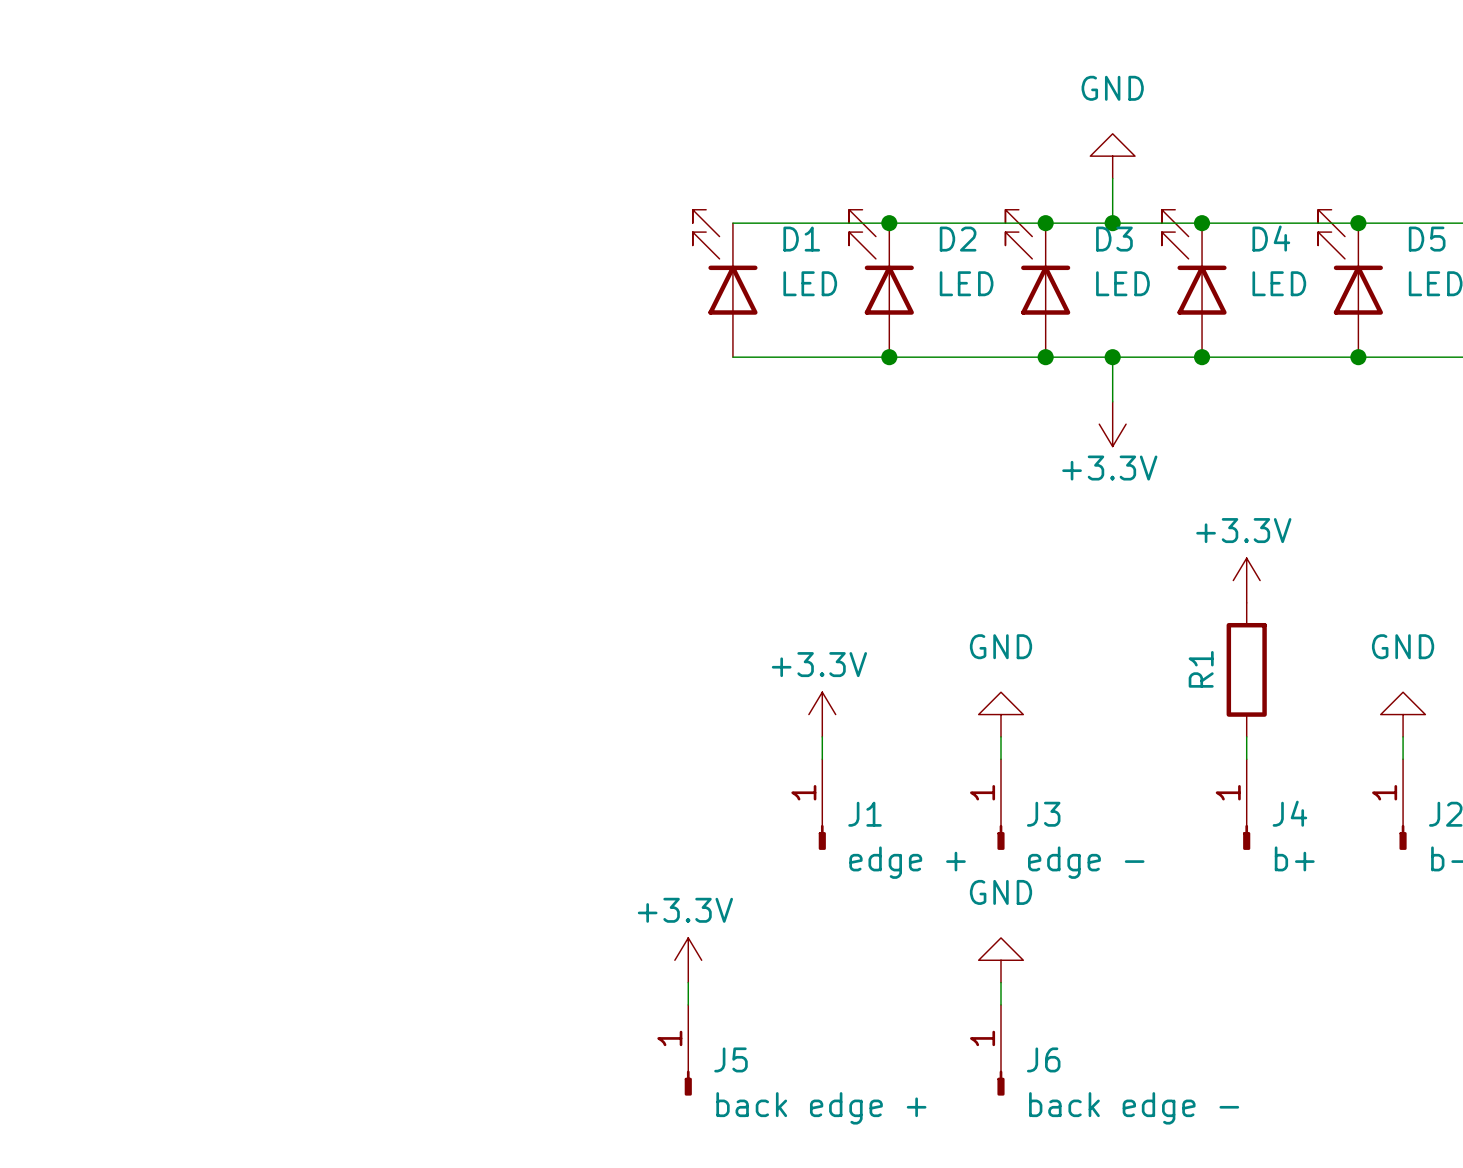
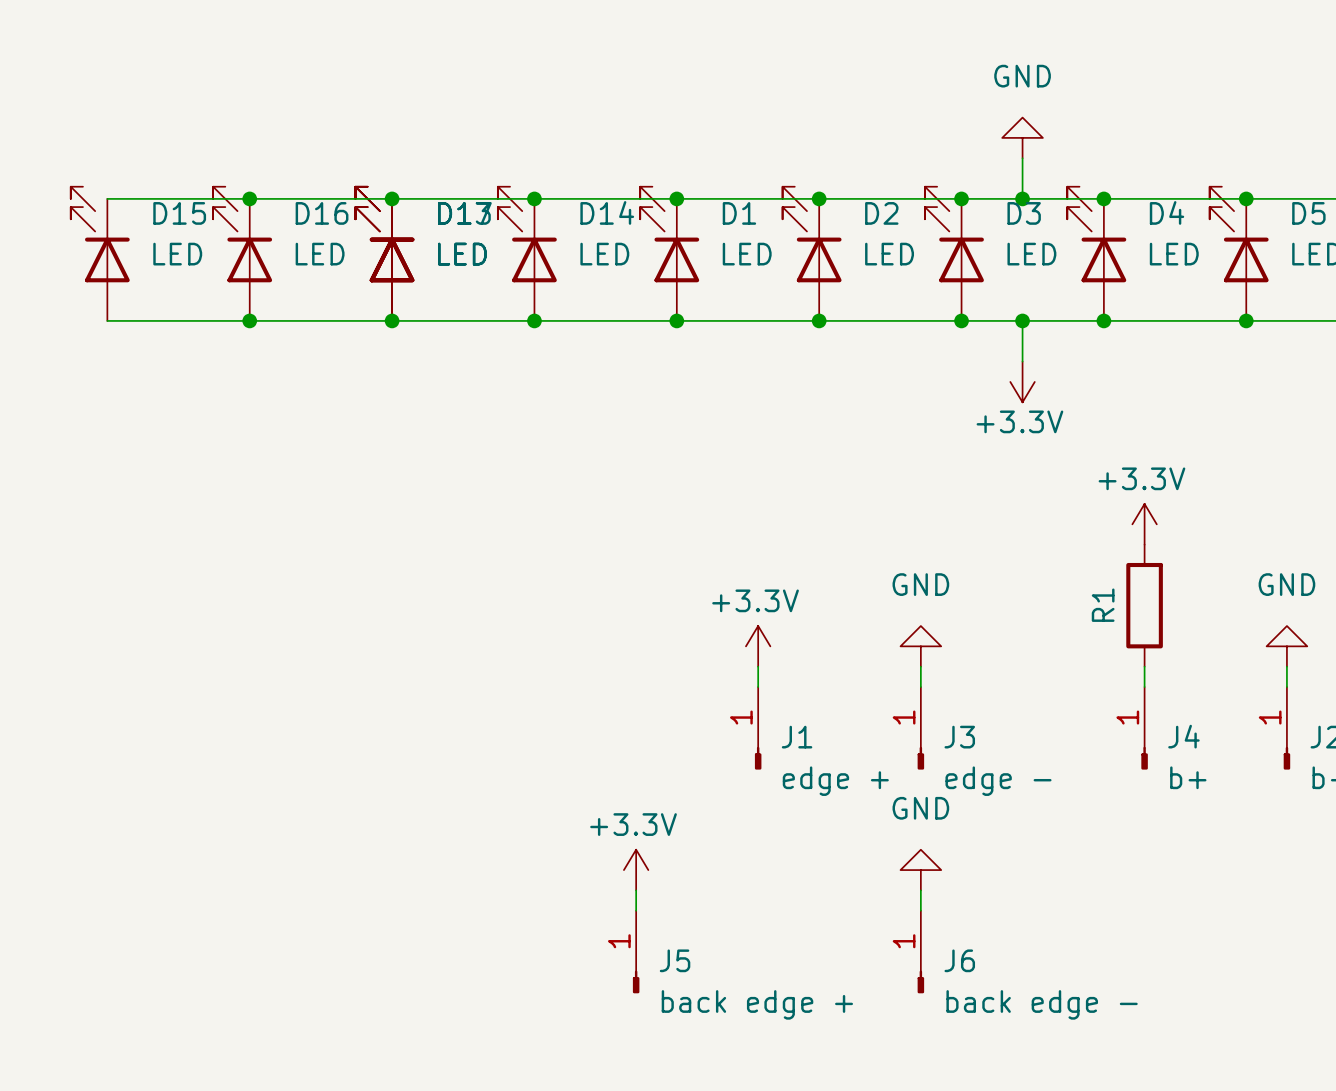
wire: none -> (107, 198) (676, 198)
junction: none -> (249, 198)
junction: none -> (392, 198)
junction: none -> (534, 198)
junction: none -> (676, 198)
D15: none -> LED (100, 253)
D16: none -> LED (242, 253)
part: none -> LED (384, 253)
part: none -> LED (384, 253)
D14: none -> LED (527, 253)
wire: none -> (107, 320) (676, 320)
junction: none -> (249, 320)
junction: none -> (392, 320)
junction: none -> (534, 320)
junction: none -> (676, 320)

